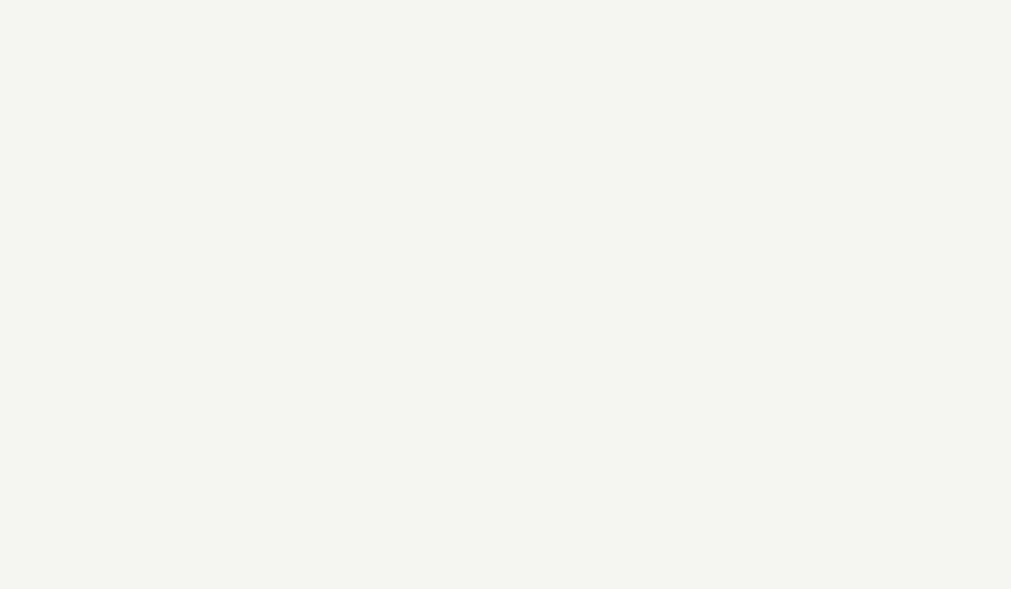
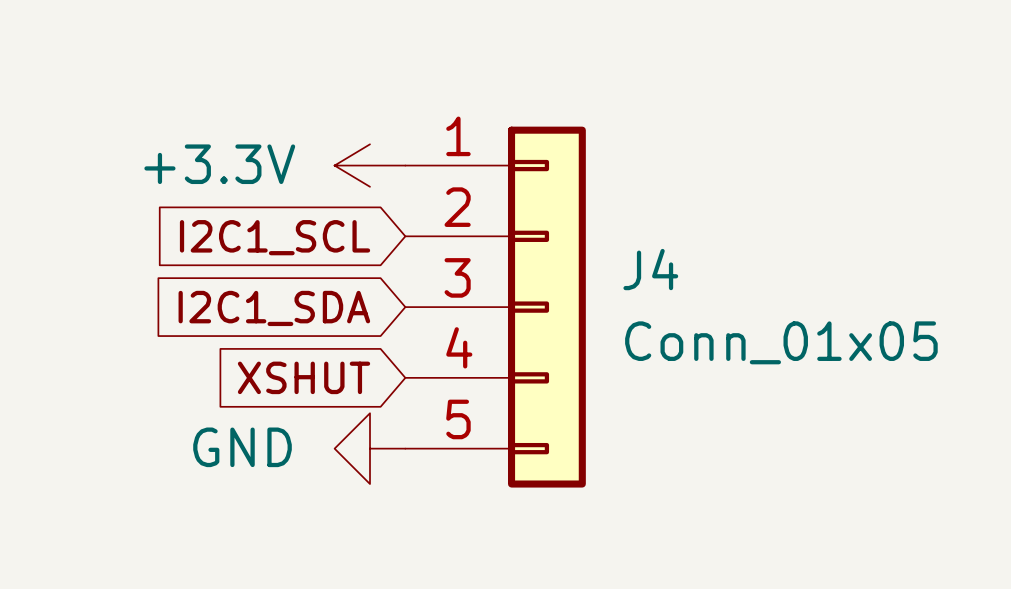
power symbol: none -> +3.3V (369, 165)
global label: none -> I2C1_SCL (275, 237)
J4: none -> Conn_01x05 (495, 307)
global label: none -> I2C1_SDA (274, 308)
global label: none -> XSHUT (304, 377)
power symbol: none -> GND (369, 448)

